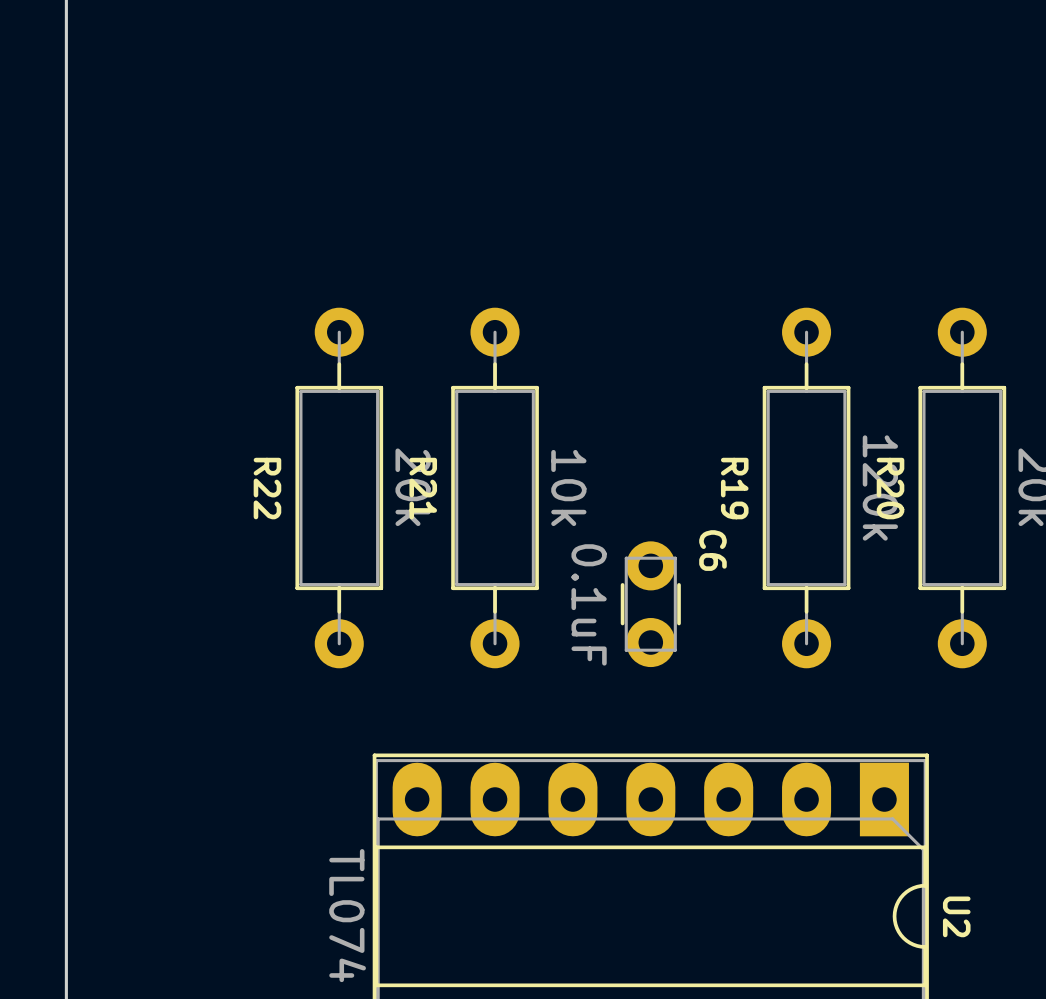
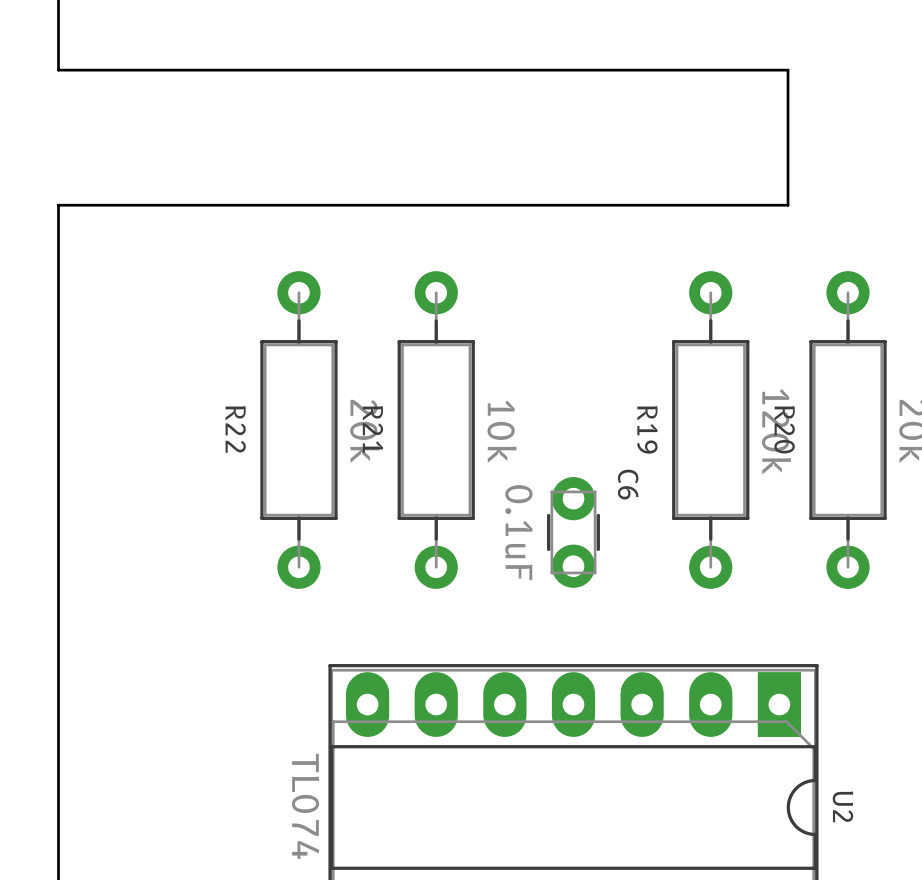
board edge: (66, 79) (66, 232) -> (58, 70) (788, 70) (788, 205) (58, 205)

